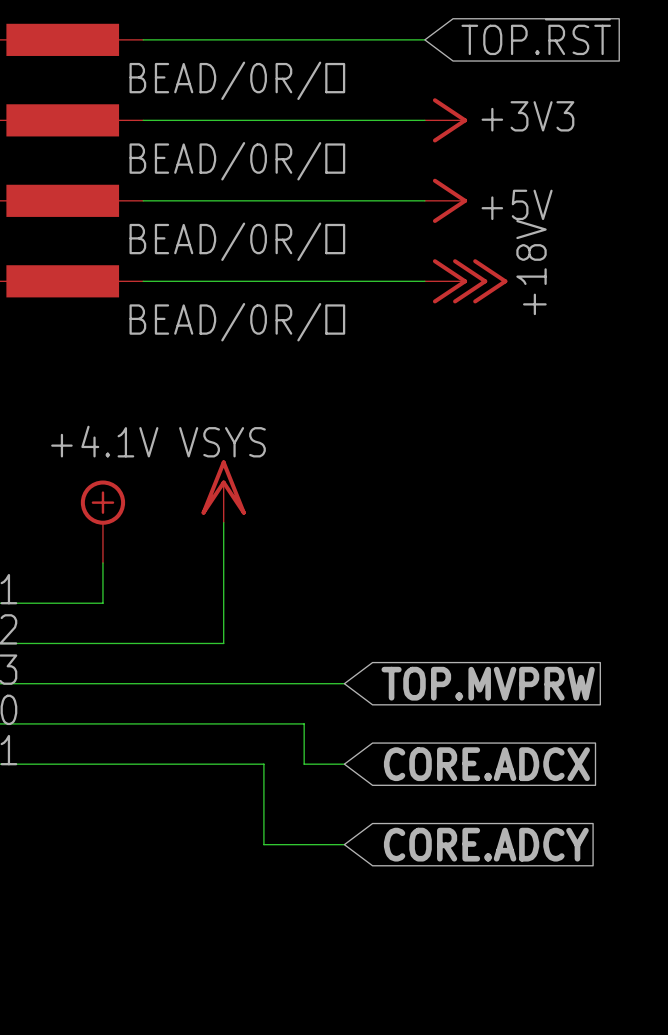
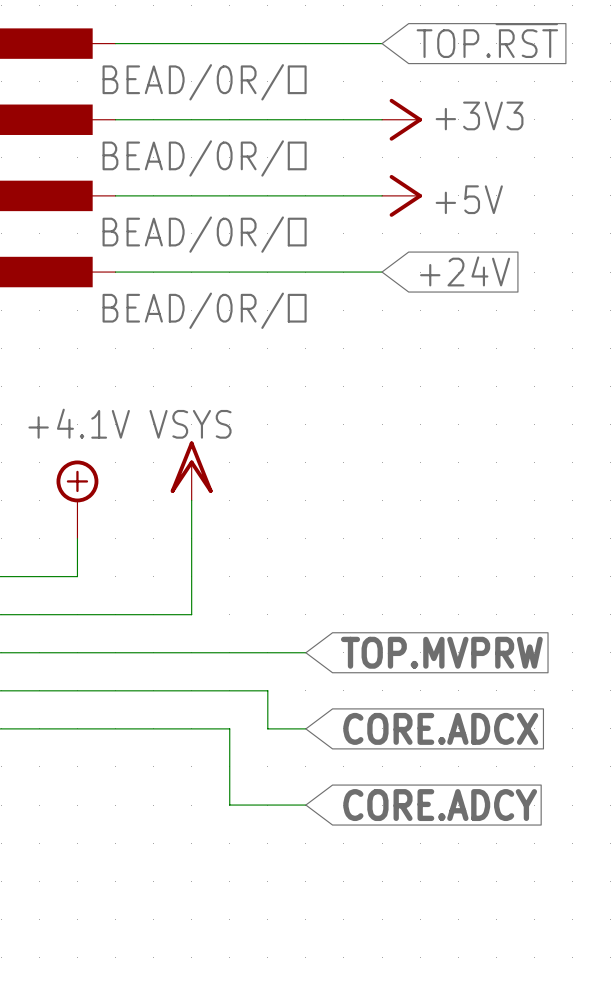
global label: none -> +24V (465, 271)
power symbol: +18V (466, 281) -> none

